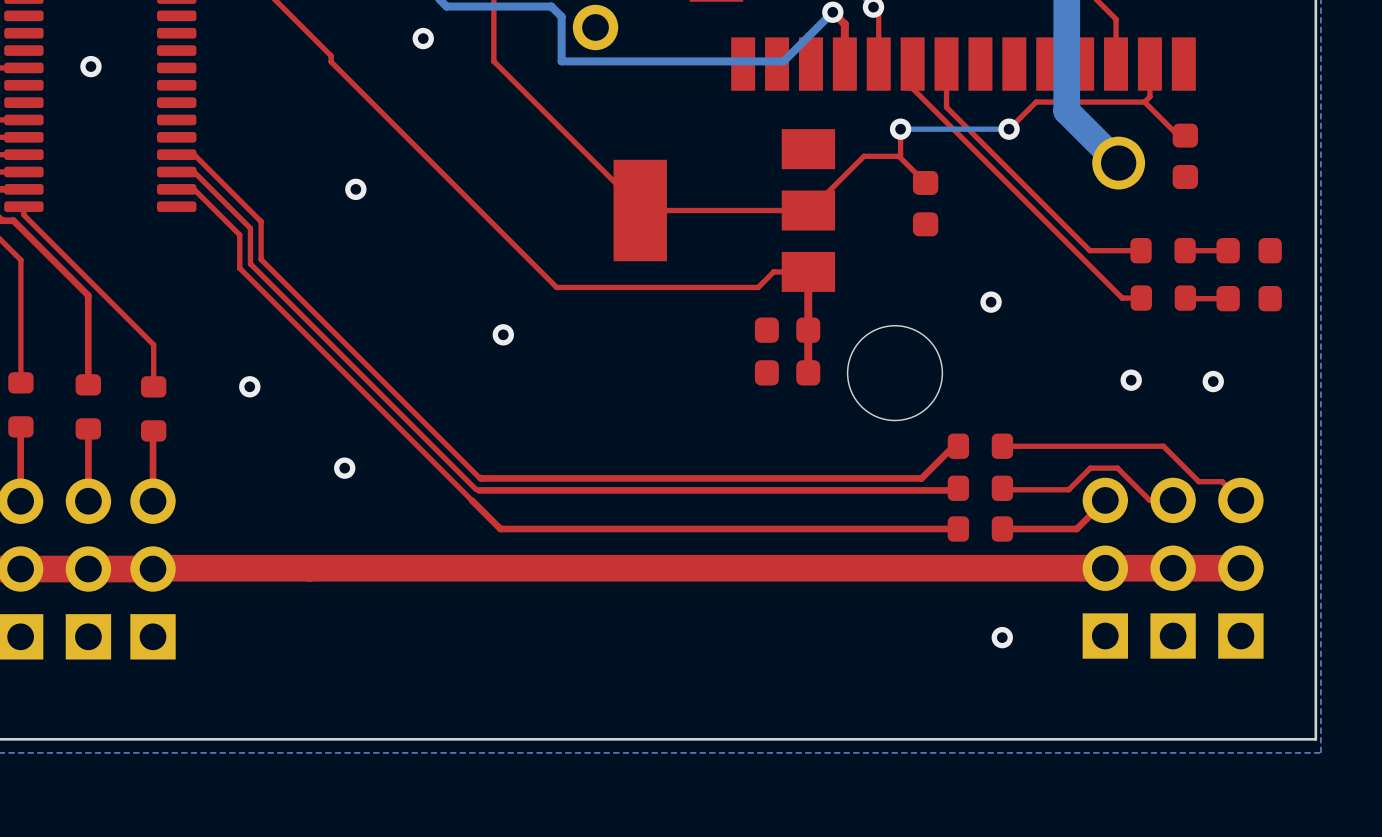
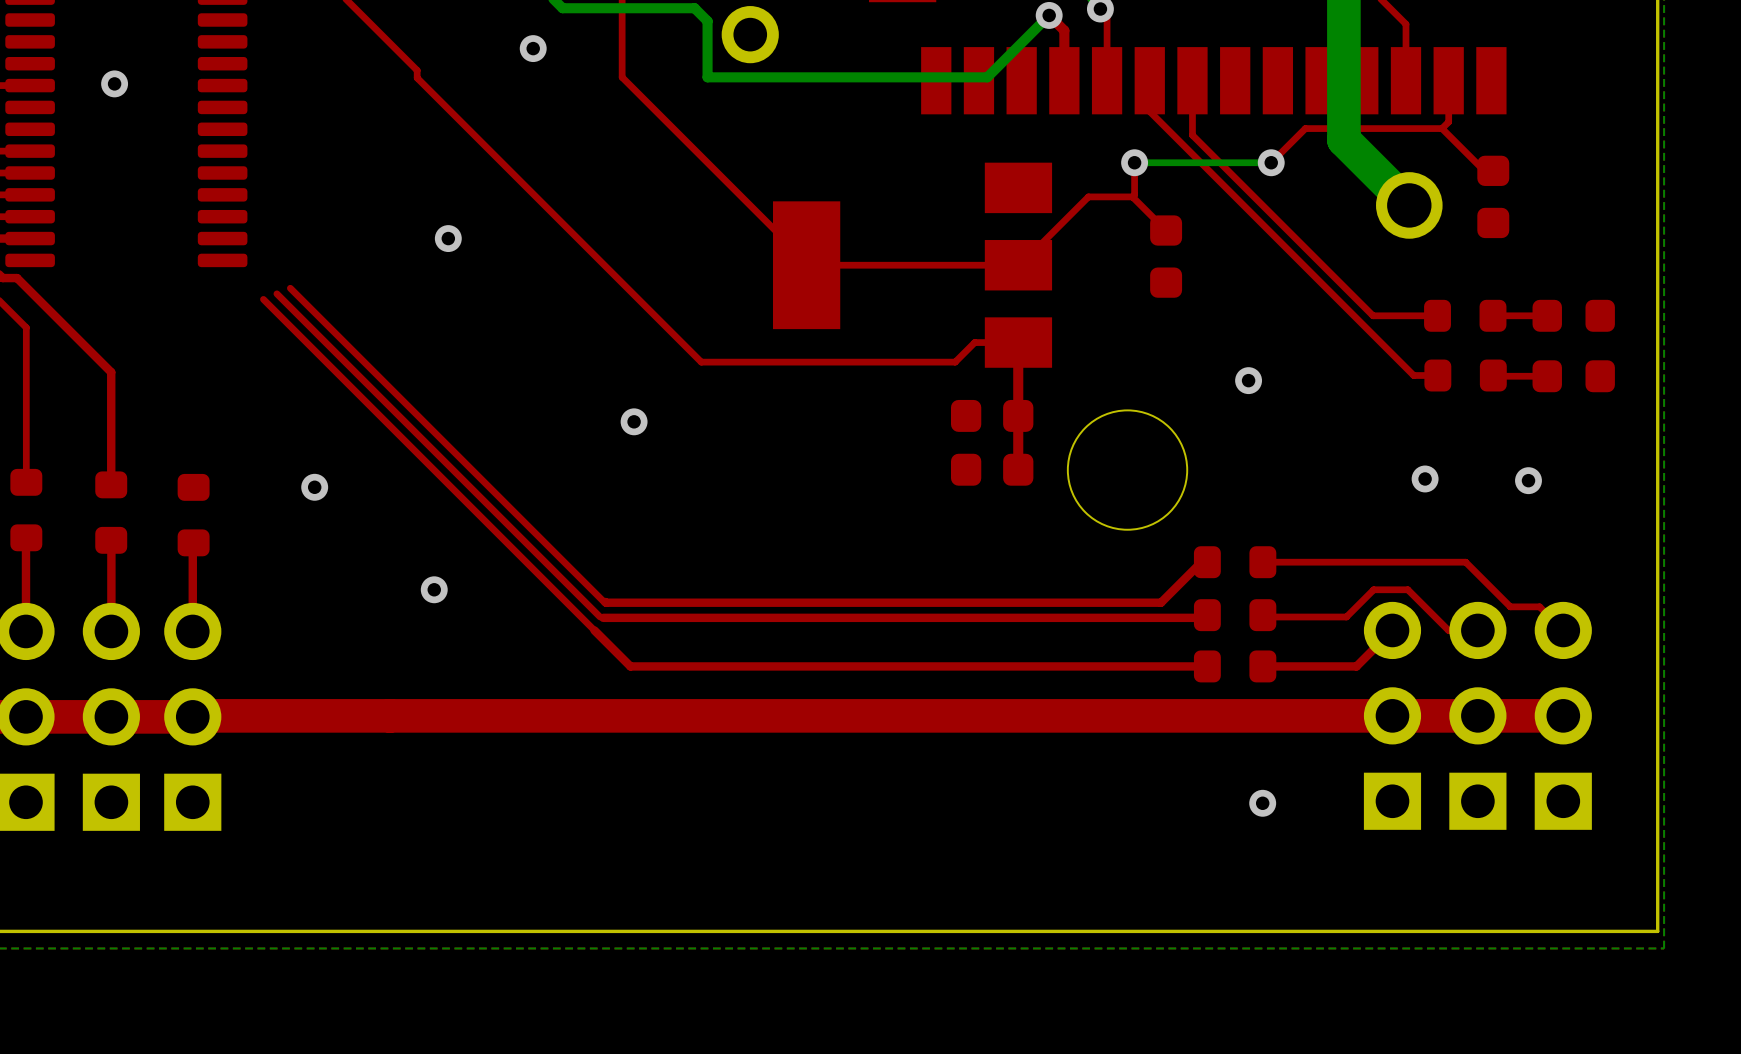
top track: (176, 154) (194, 154) (261, 221) (261, 259) -> (290, 288) (328, 326)
top track: (176, 172) (194, 172) (250, 228) (250, 263) -> (276, 293) (315, 332)
top track: (176, 189) (194, 189) (239, 234) (239, 268) -> (263, 299) (302, 337)
top track: (23, 206) (23, 215) (153, 344) (153, 386) -> none

